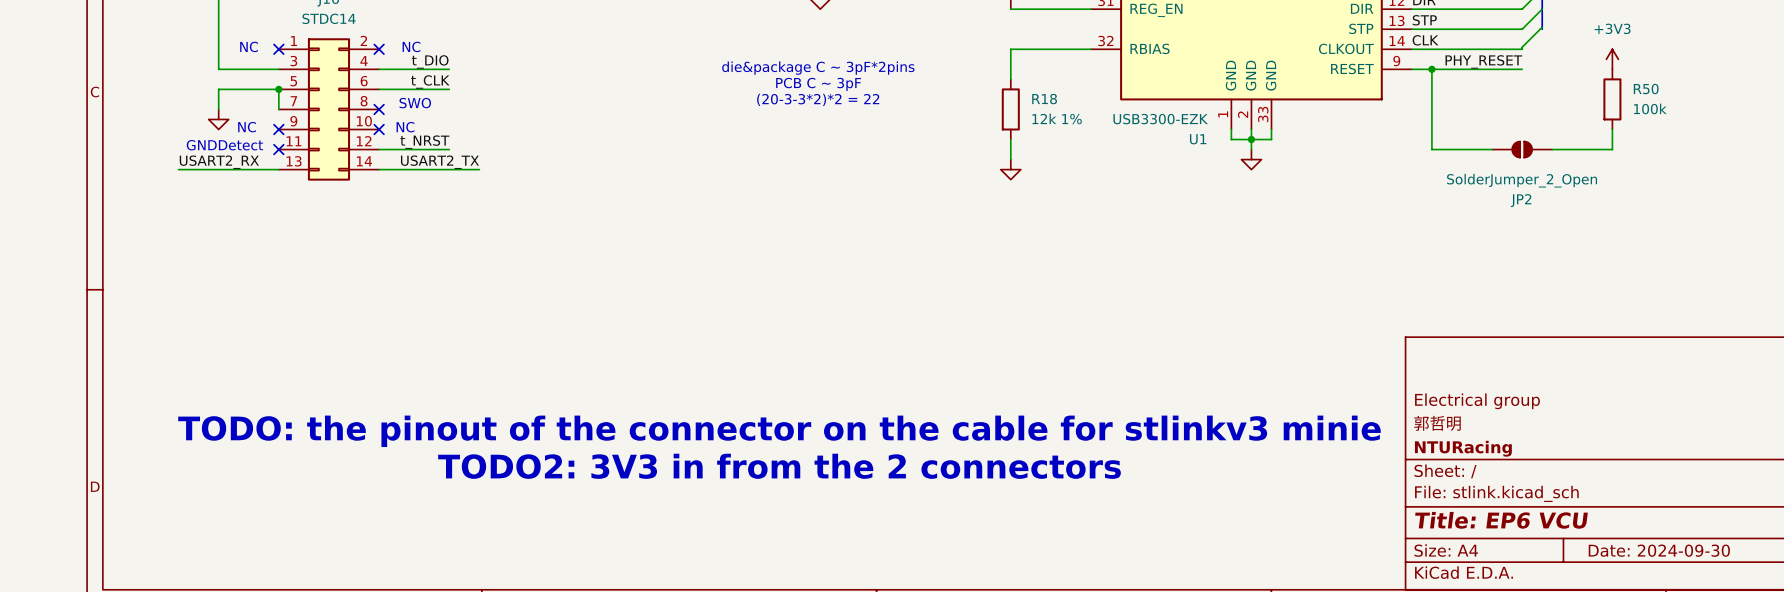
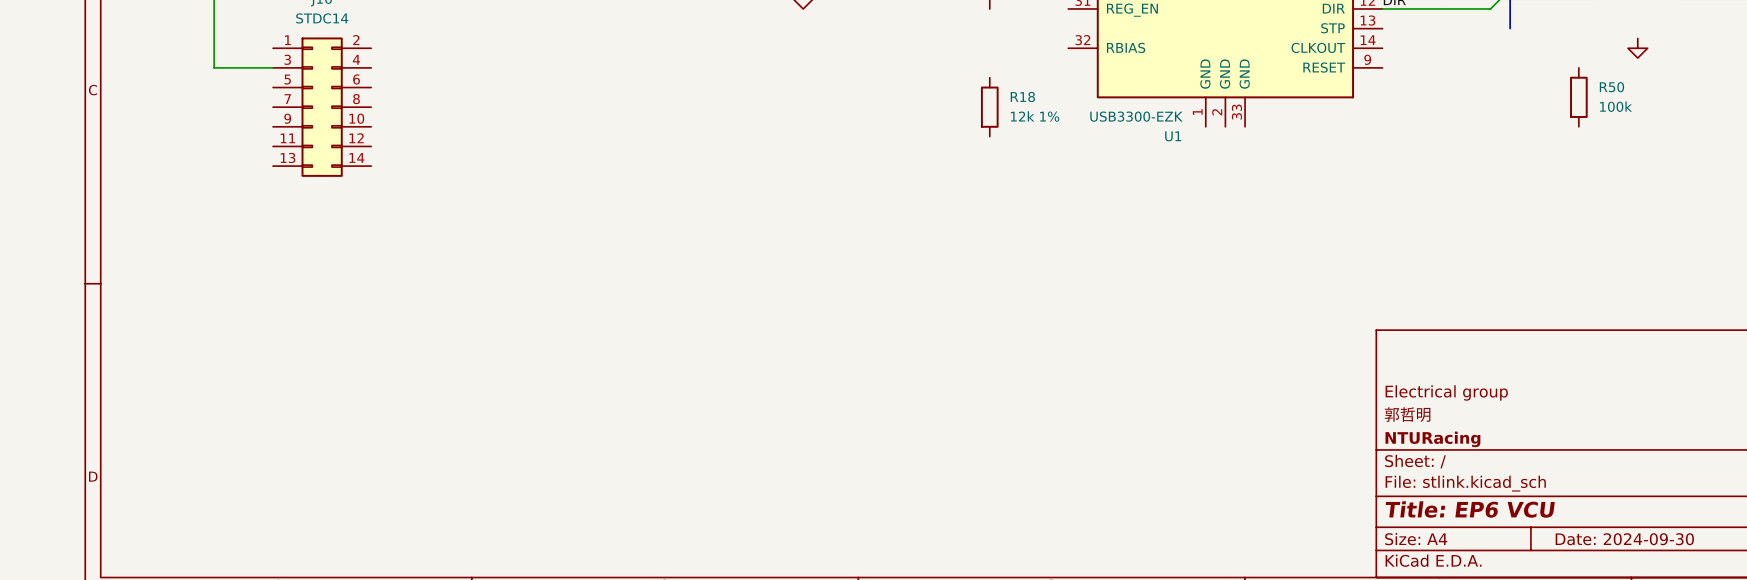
wire: (1010, 9) (1091, 9) -> none
wire: (1542, 9) (1522, 29) (1411, 29) -> none
label: STP (1424, 20) -> none
wire: (1542, 27) (1522, 49) (1411, 49) -> none
label: CLK (1425, 40) -> none
text: NC (249, 46) -> none
text: NC (411, 46) -> none
no-connect mark: (278, 49) -> none
no-connect mark: (379, 49) -> none
wire: (1091, 49) (1010, 49) (1010, 79) -> none
power symbol: none -> (1637, 48)
power symbol: +3V3 (1612, 59) -> none
label: t_DIO (430, 61) -> none
label: PHY_RESET (1483, 61) -> none
text: die&package C ~ 3pF*2pins (818, 68) -> none
wire: (379, 69) (449, 69) -> none
wire: (1411, 69) (1522, 69) -> none
wire: (1431, 69) (1431, 149) (1492, 149) -> none
junction: (1431, 69) -> none
label: t_CLK (430, 81) -> none
text: PCB C ~ 3pF (818, 84) -> none
junction: (278, 89) -> none
wire: (379, 89) (449, 89) -> none
text: (20-3-3*2)*2 = 22 (818, 99) -> none
text: SWO (415, 103) -> none
wire: (218, 109) (218, 89) (278, 89) (278, 109) -> none
no-connect mark: (379, 109) -> none
power symbol: (218, 119) -> none
text: NC (247, 127) -> none
text: NC (405, 127) -> none
no-connect mark: (278, 129) -> none
no-connect mark: (379, 129) -> none
wire: (1231, 129) (1231, 139) (1271, 139) (1271, 129) -> none
wire: (1251, 129) (1251, 149) -> none
wire: (1612, 129) (1612, 149) (1552, 149) -> none
wire: (1010, 139) (1010, 159) -> none
junction: (1251, 139) -> none
label: t_NRST (424, 142) -> none
text: GNDDetect (224, 145) -> none
no-connect mark: (278, 149) -> none
wire: (379, 149) (449, 149) -> none
JP2: SolderJumper_2_Open (1522, 149) -> none
power symbol: (1251, 159) -> none
label: USART2_RX (219, 162) -> none
label: USART2_TX (439, 162) -> none
wire: (178, 169) (278, 169) -> none
wire: (379, 169) (479, 169) -> none
power symbol: (1010, 169) -> none
text: TODO: the pinout of the connector on the cable for stlinkv3 minie (779, 431) -> none
text: TODO2: 3V3 in from the 2 connectors (779, 466) -> none

